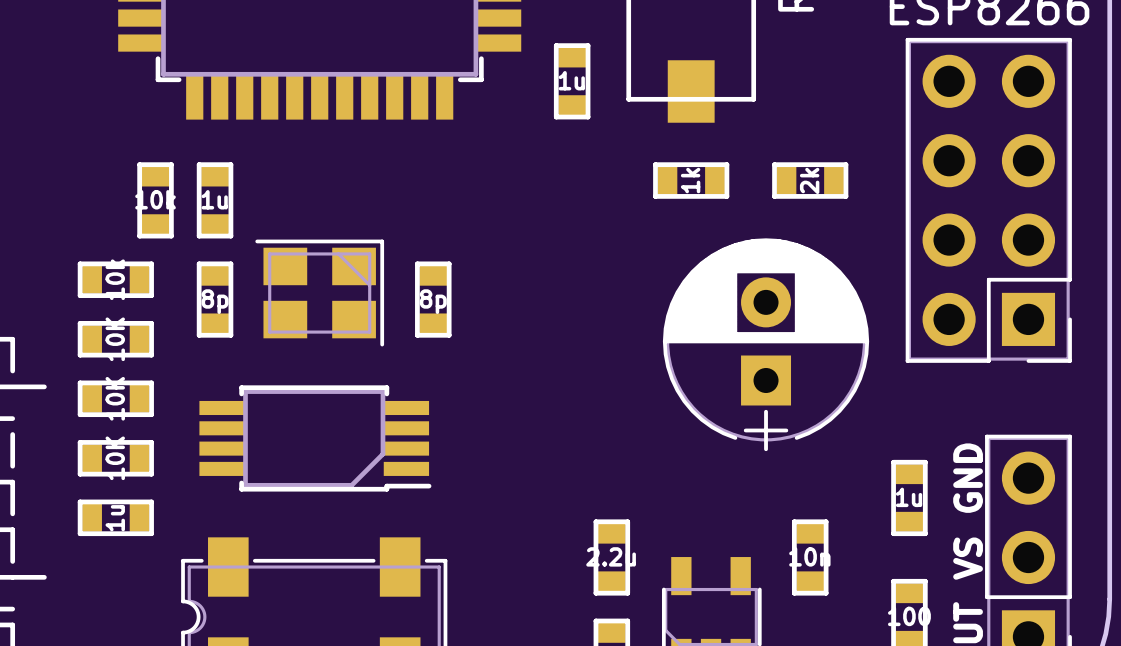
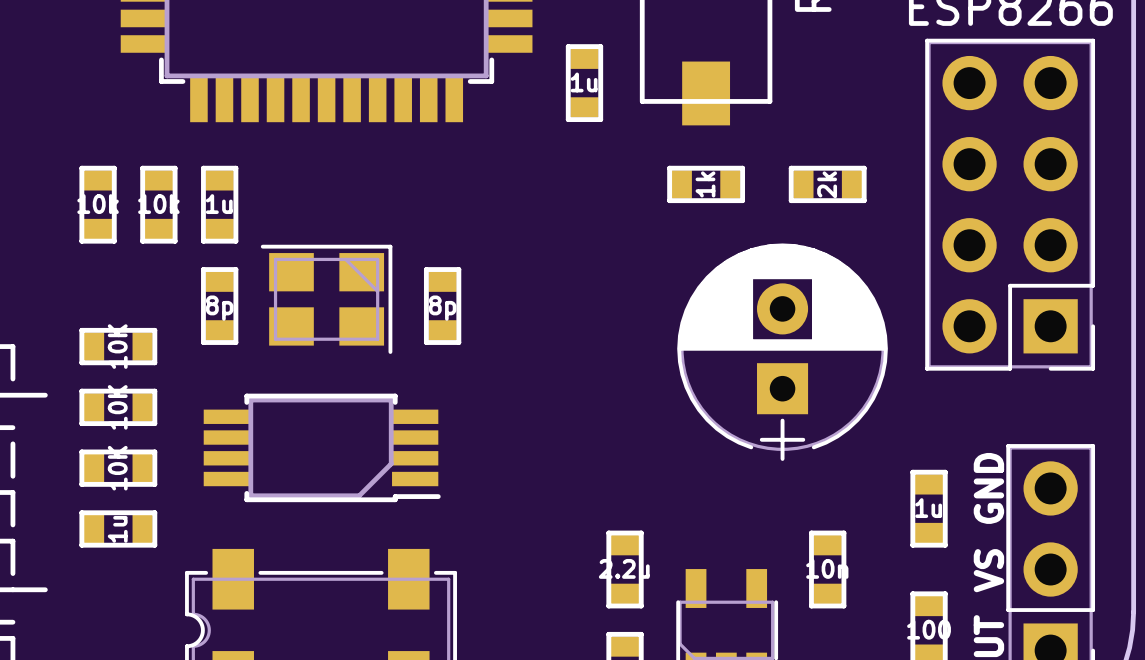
part rotation: 0° (115, 279) -> 90° clockwise (98, 204)
part position: (115, 279) -> (98, 204)

